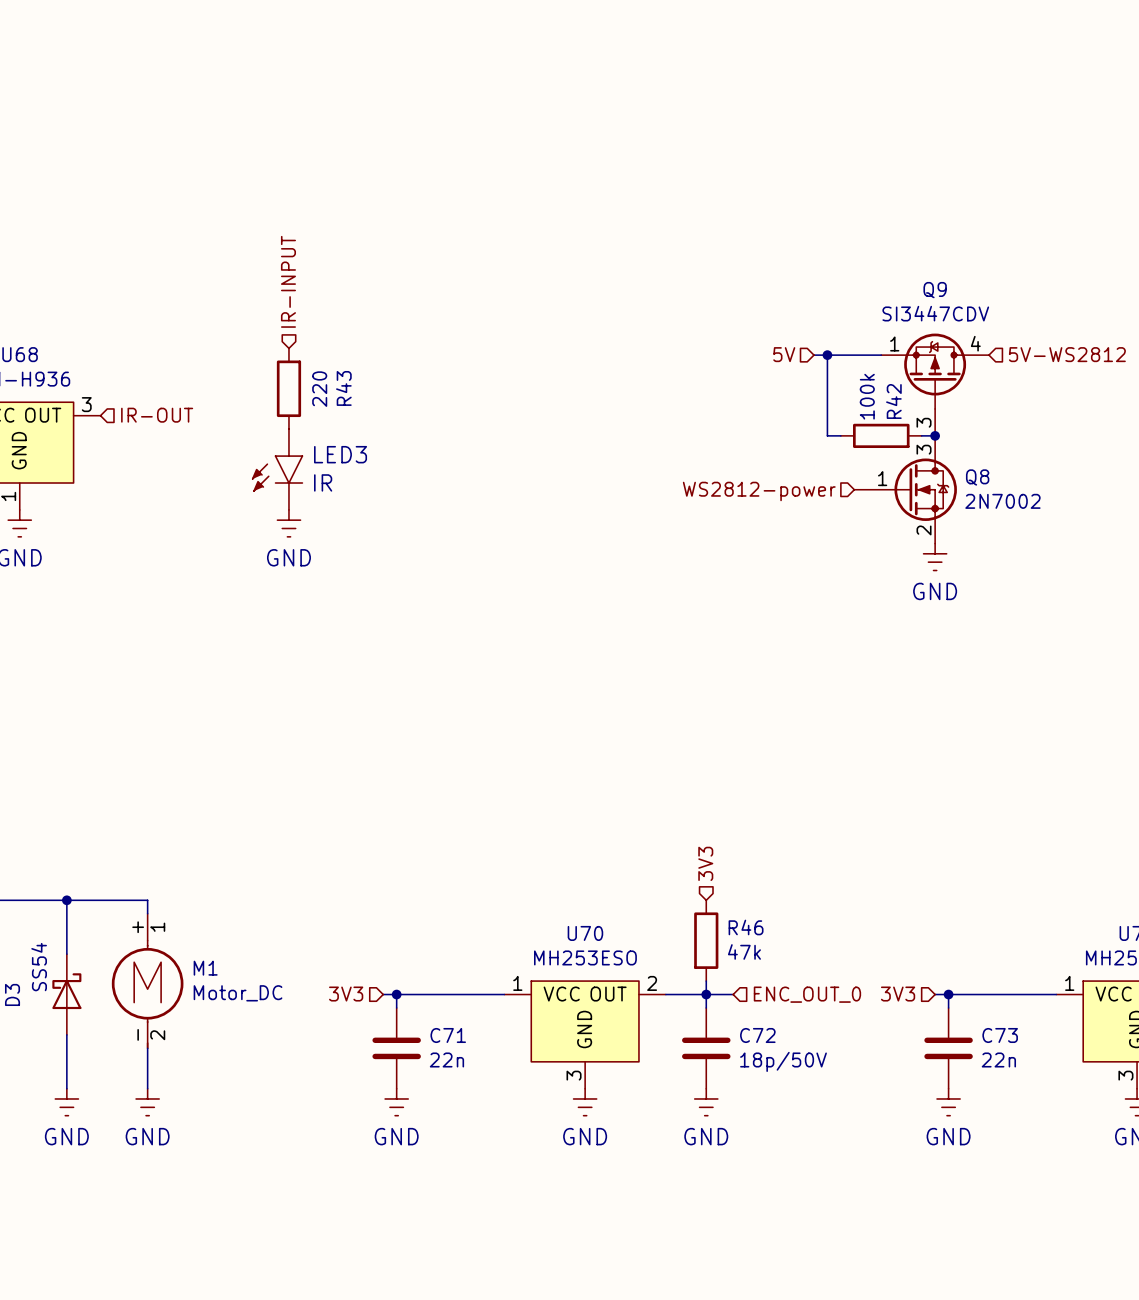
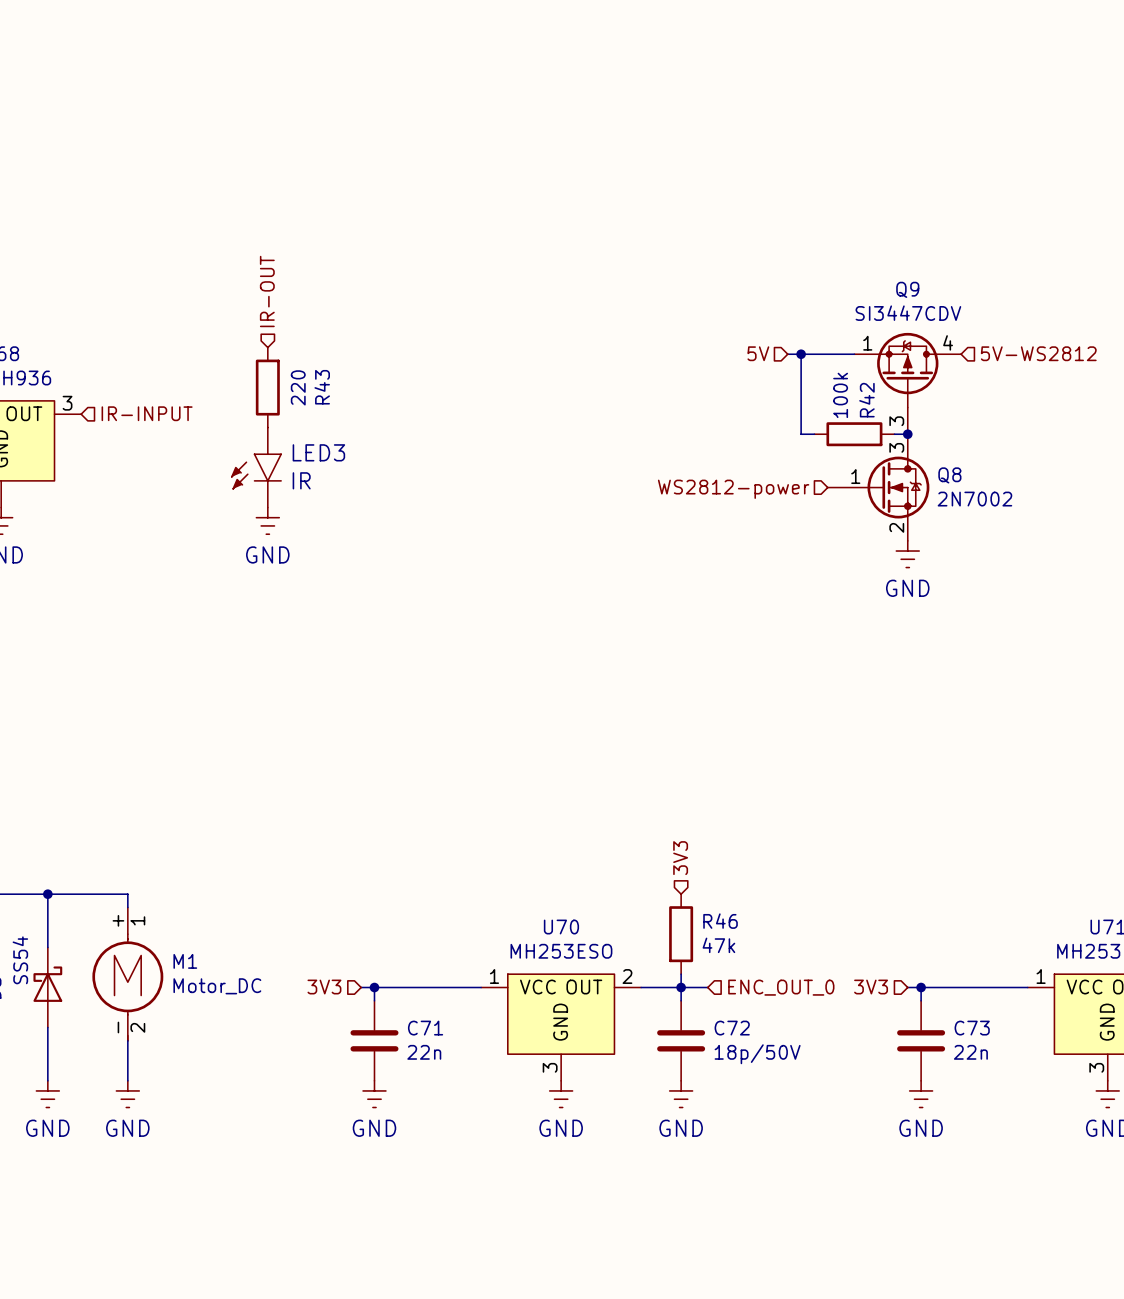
hierarchical label: IR-INPUT (288, 281) -> IR-OUT (267, 291)
hierarchical label: IR-OUT (157, 415) -> IR-INPUT (147, 413)

